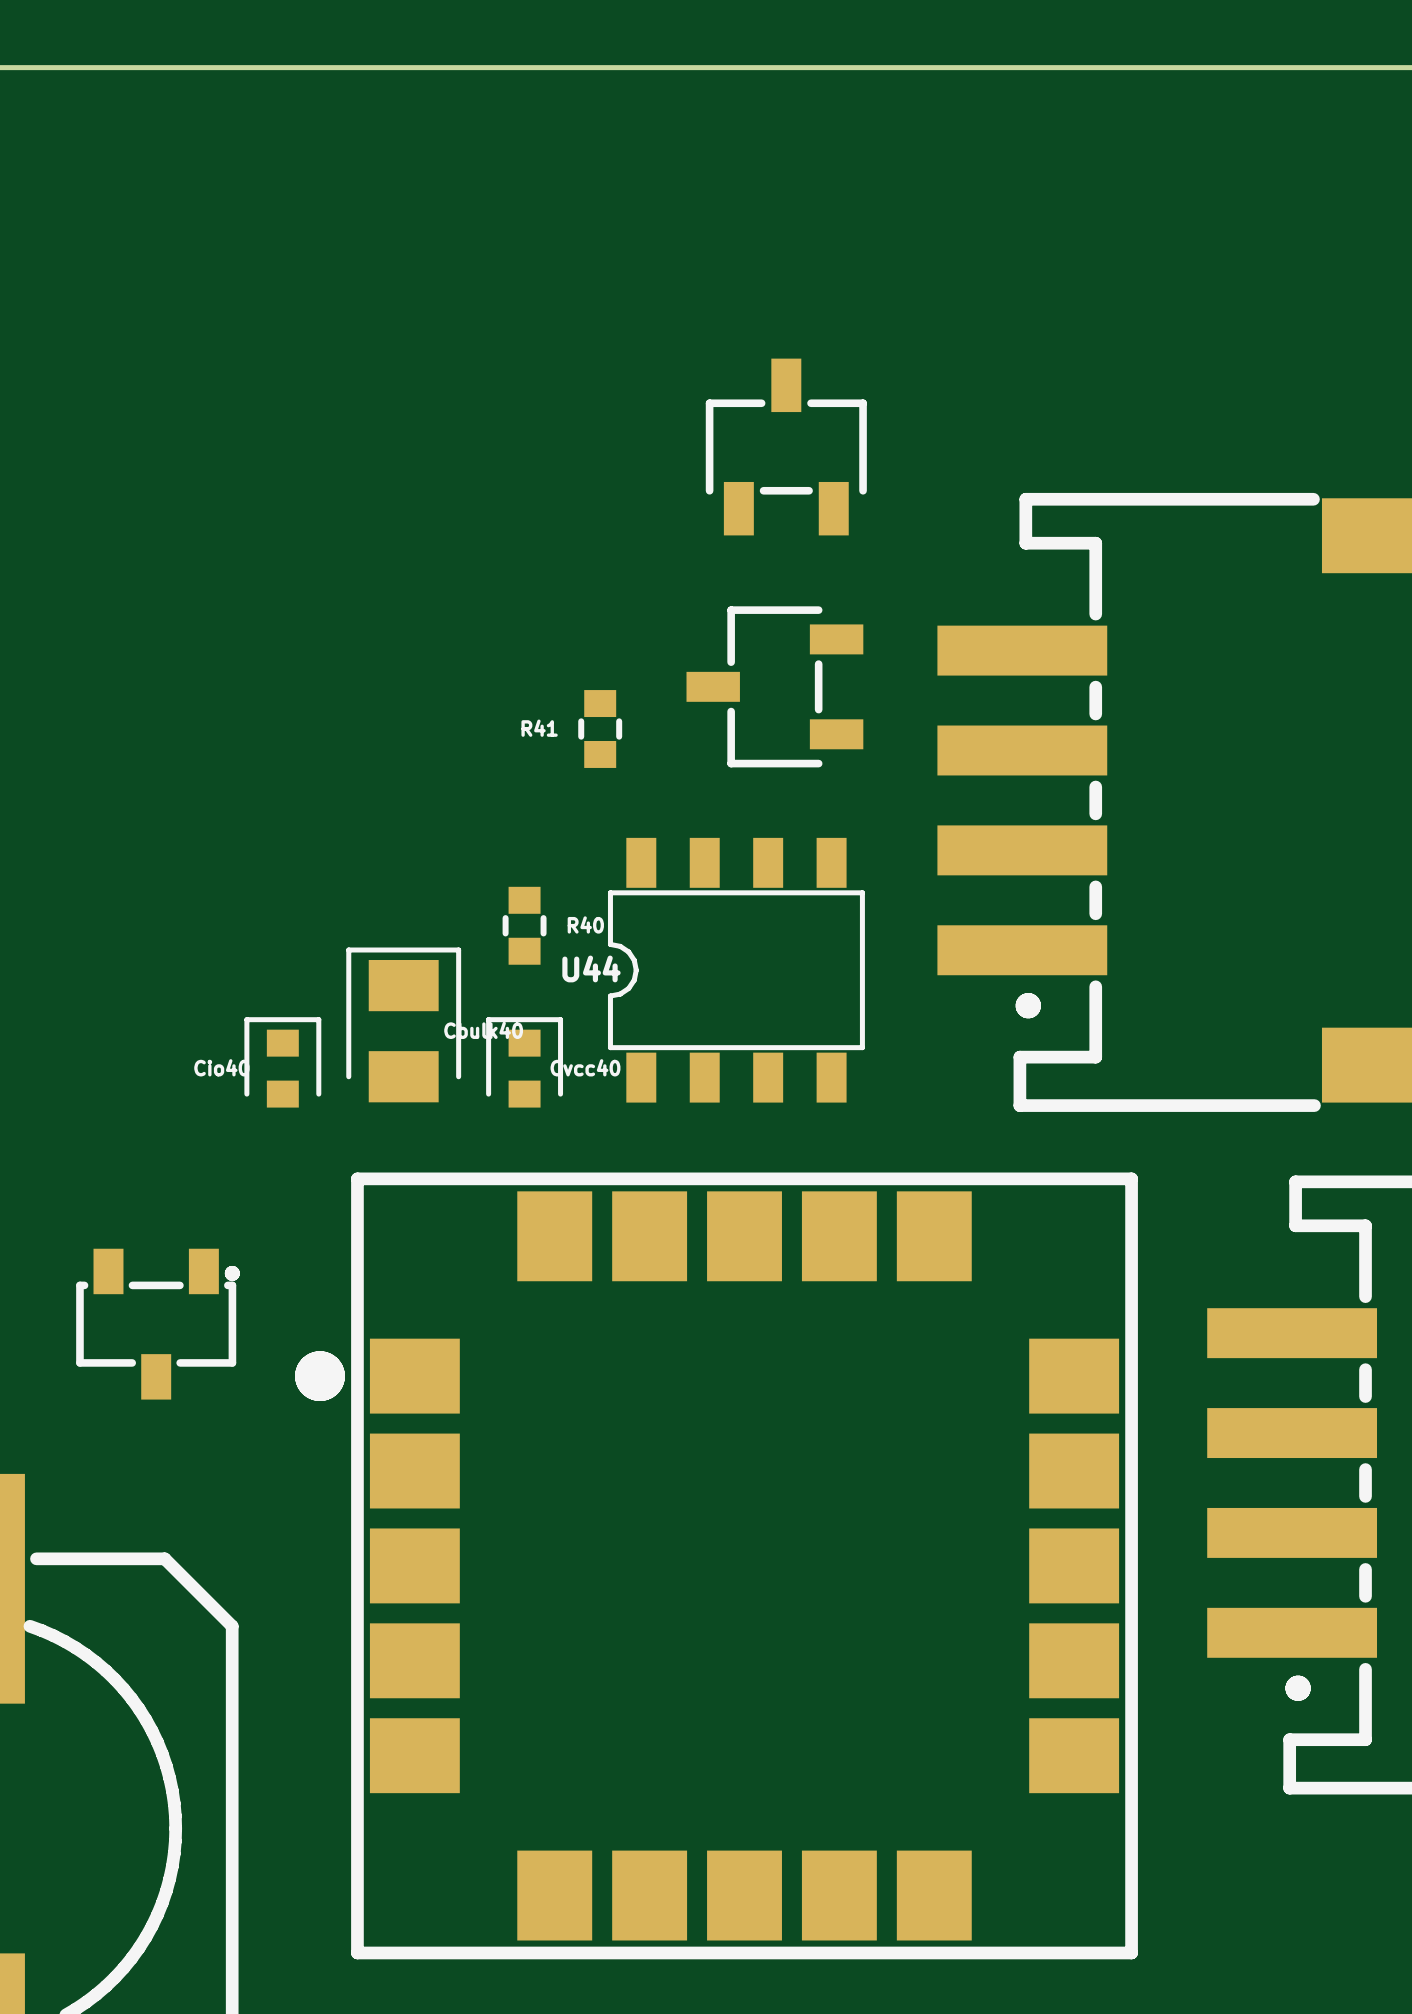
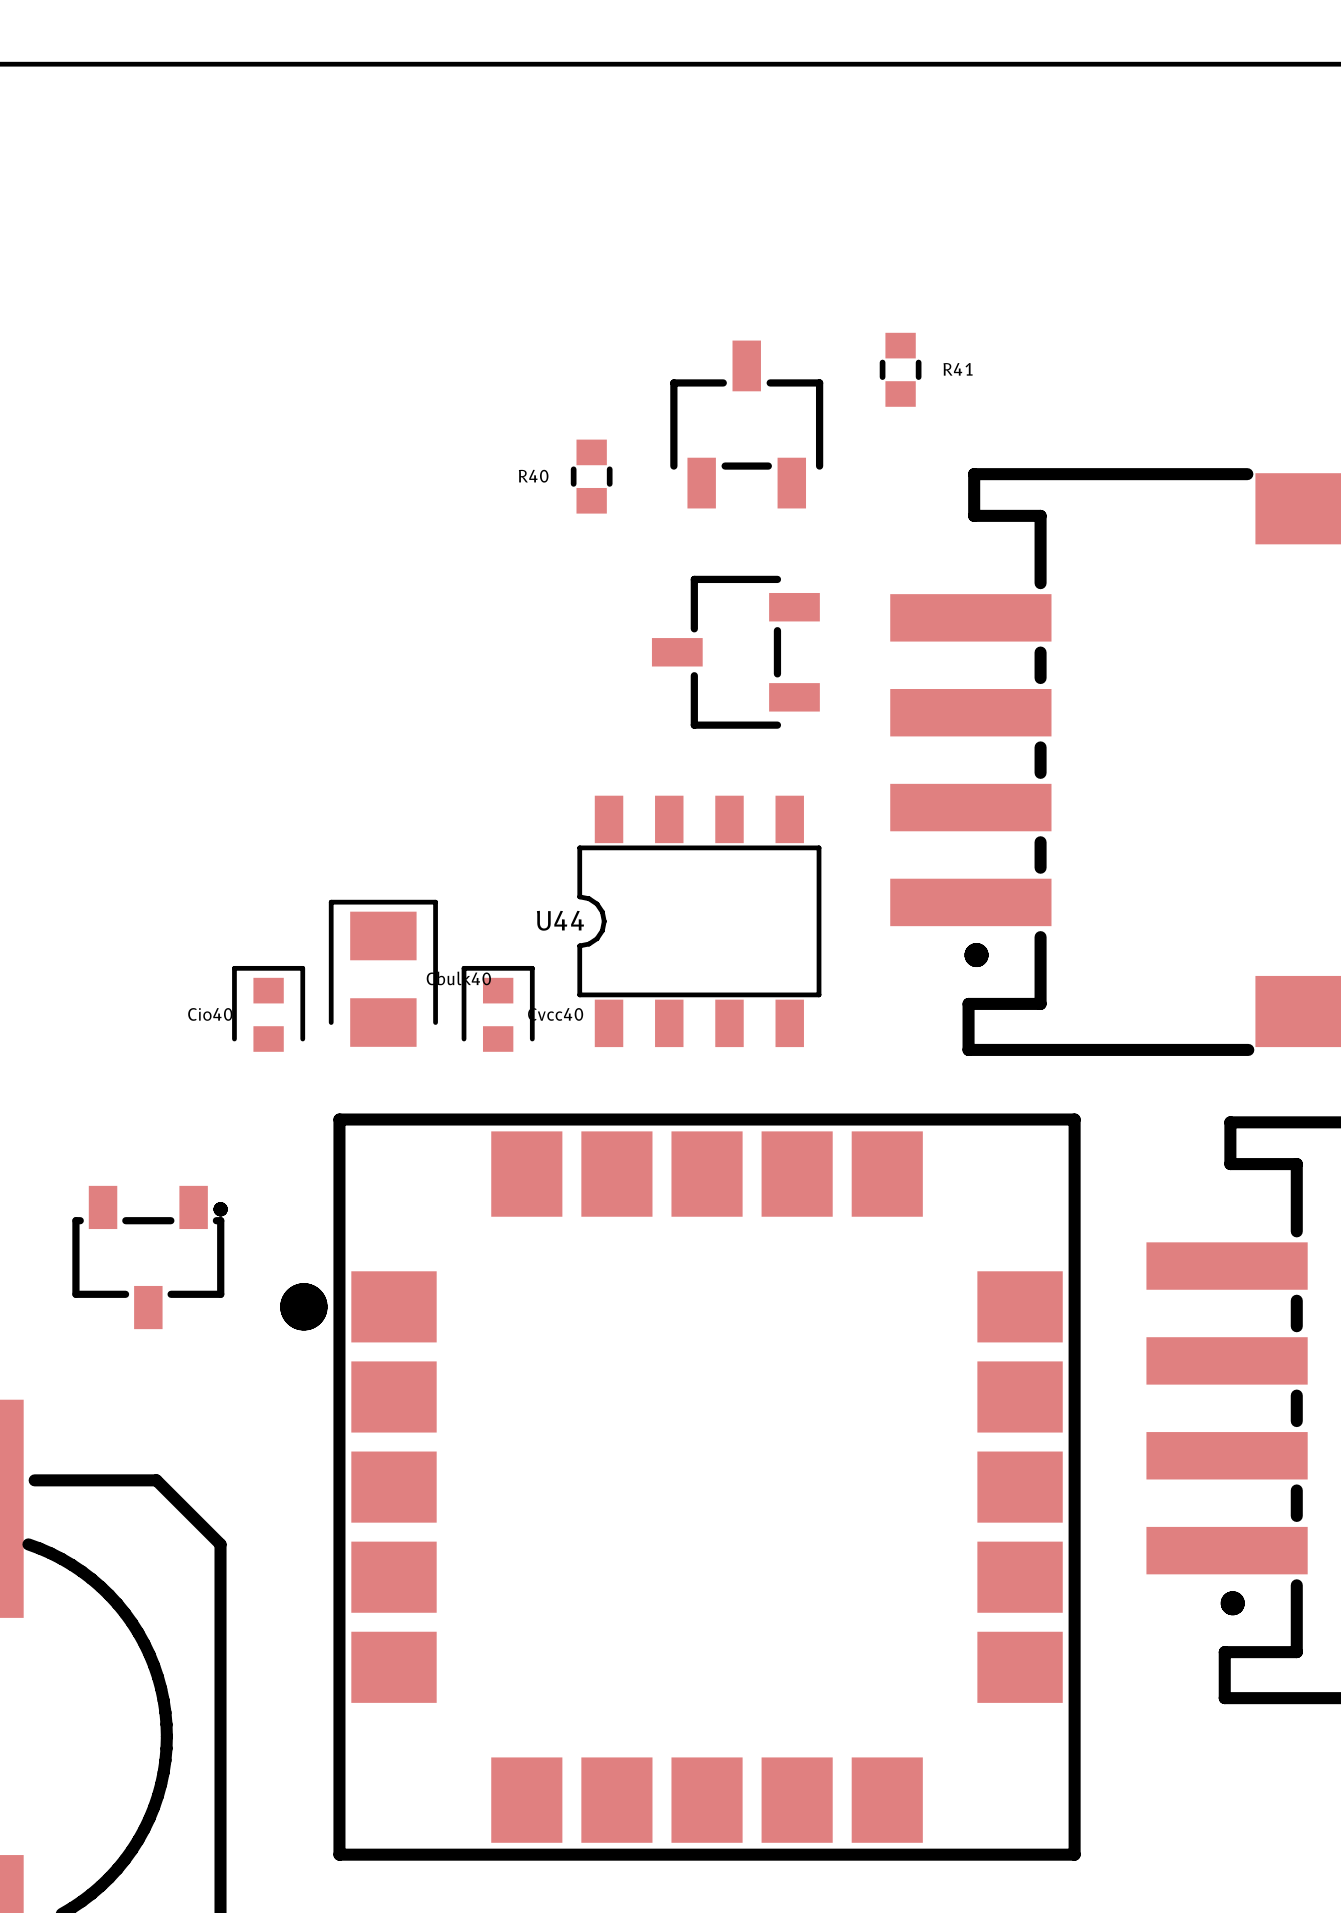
R41 name position: R41 (539, 728) -> R41 (958, 369)
R41 position: (600, 729) -> (900, 369)
R40 name position: R40 (585, 924) -> R40 (533, 476)
R40 position: (524, 925) -> (591, 476)

